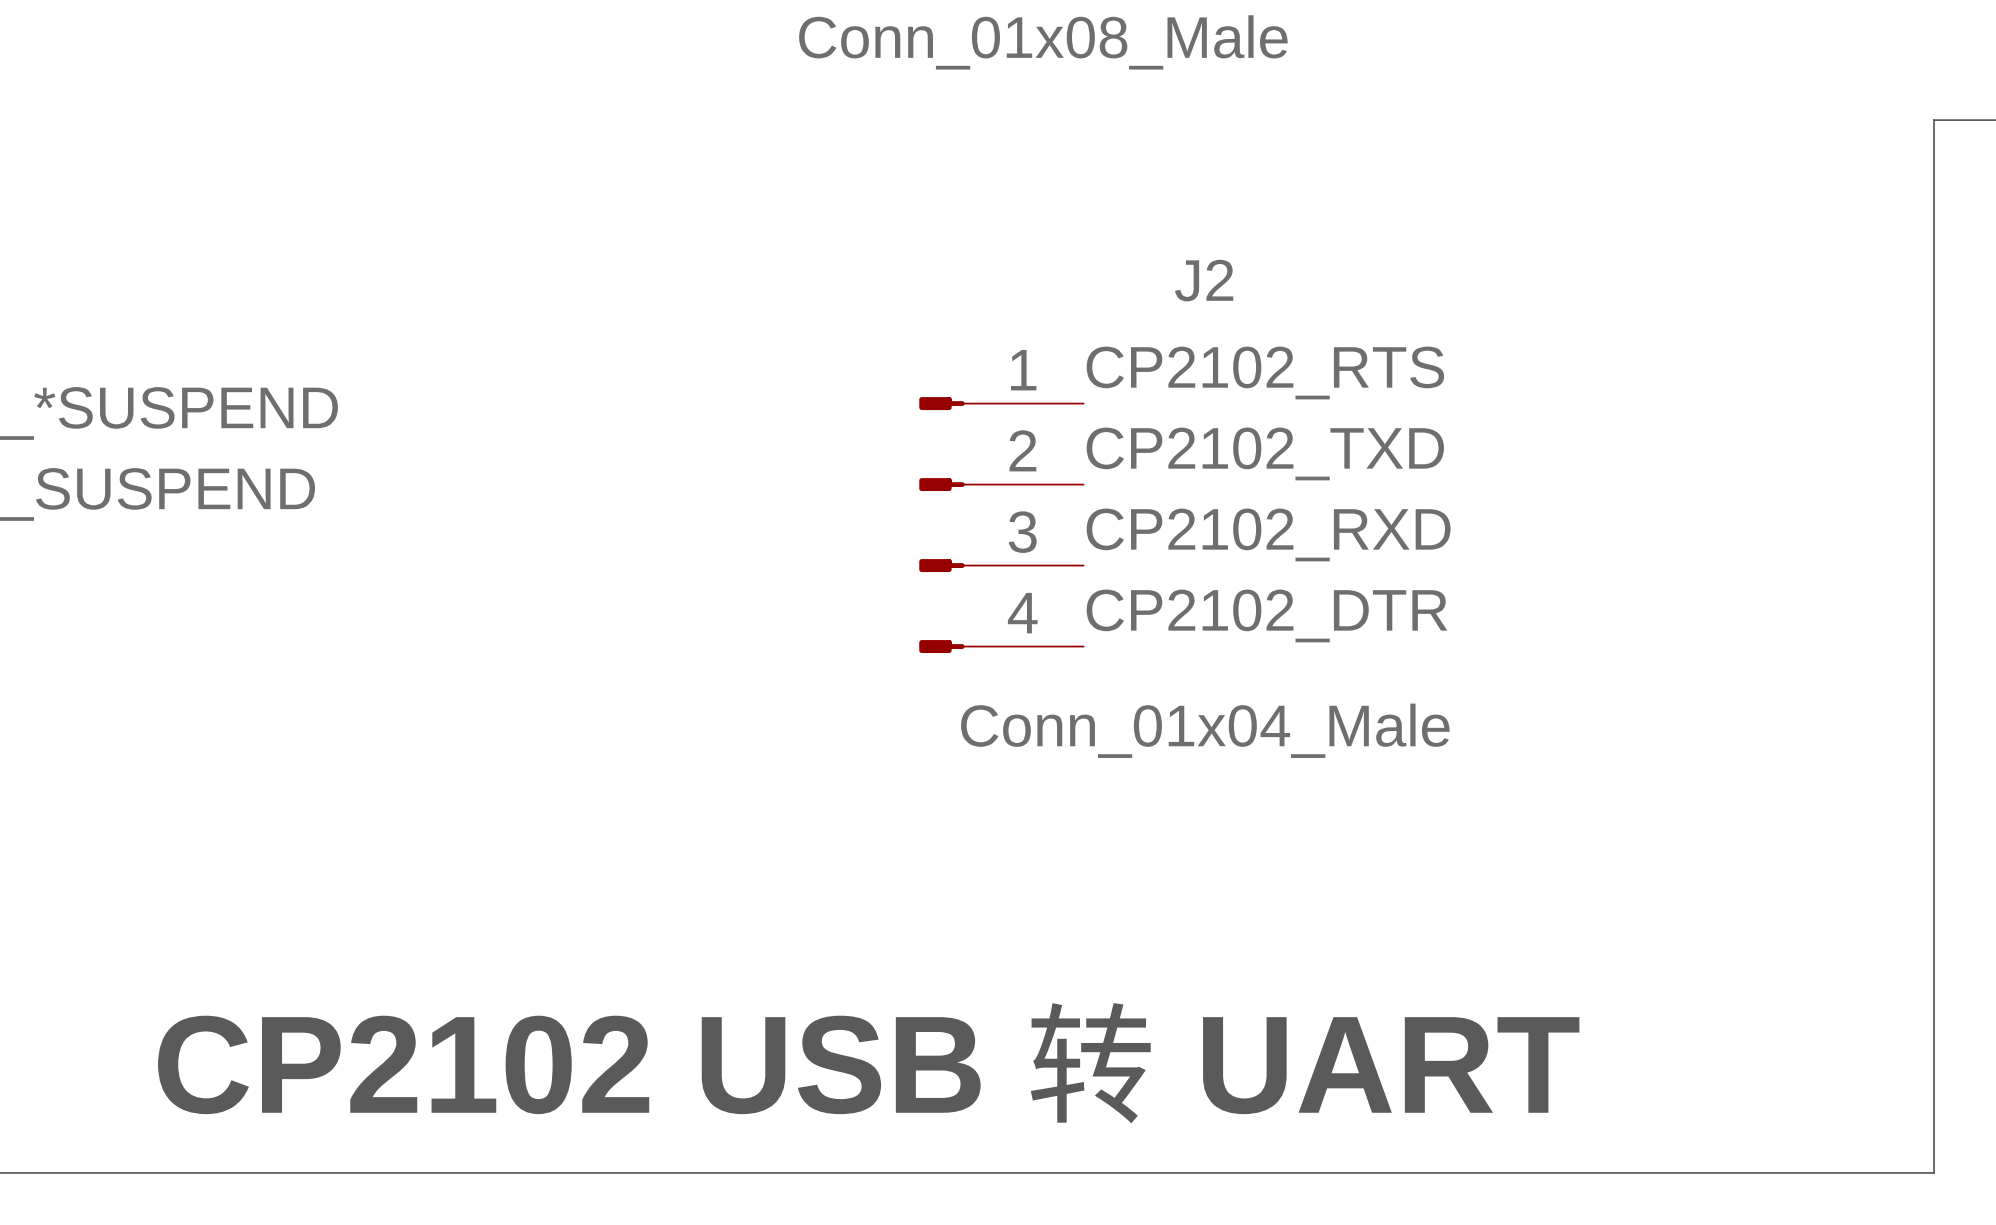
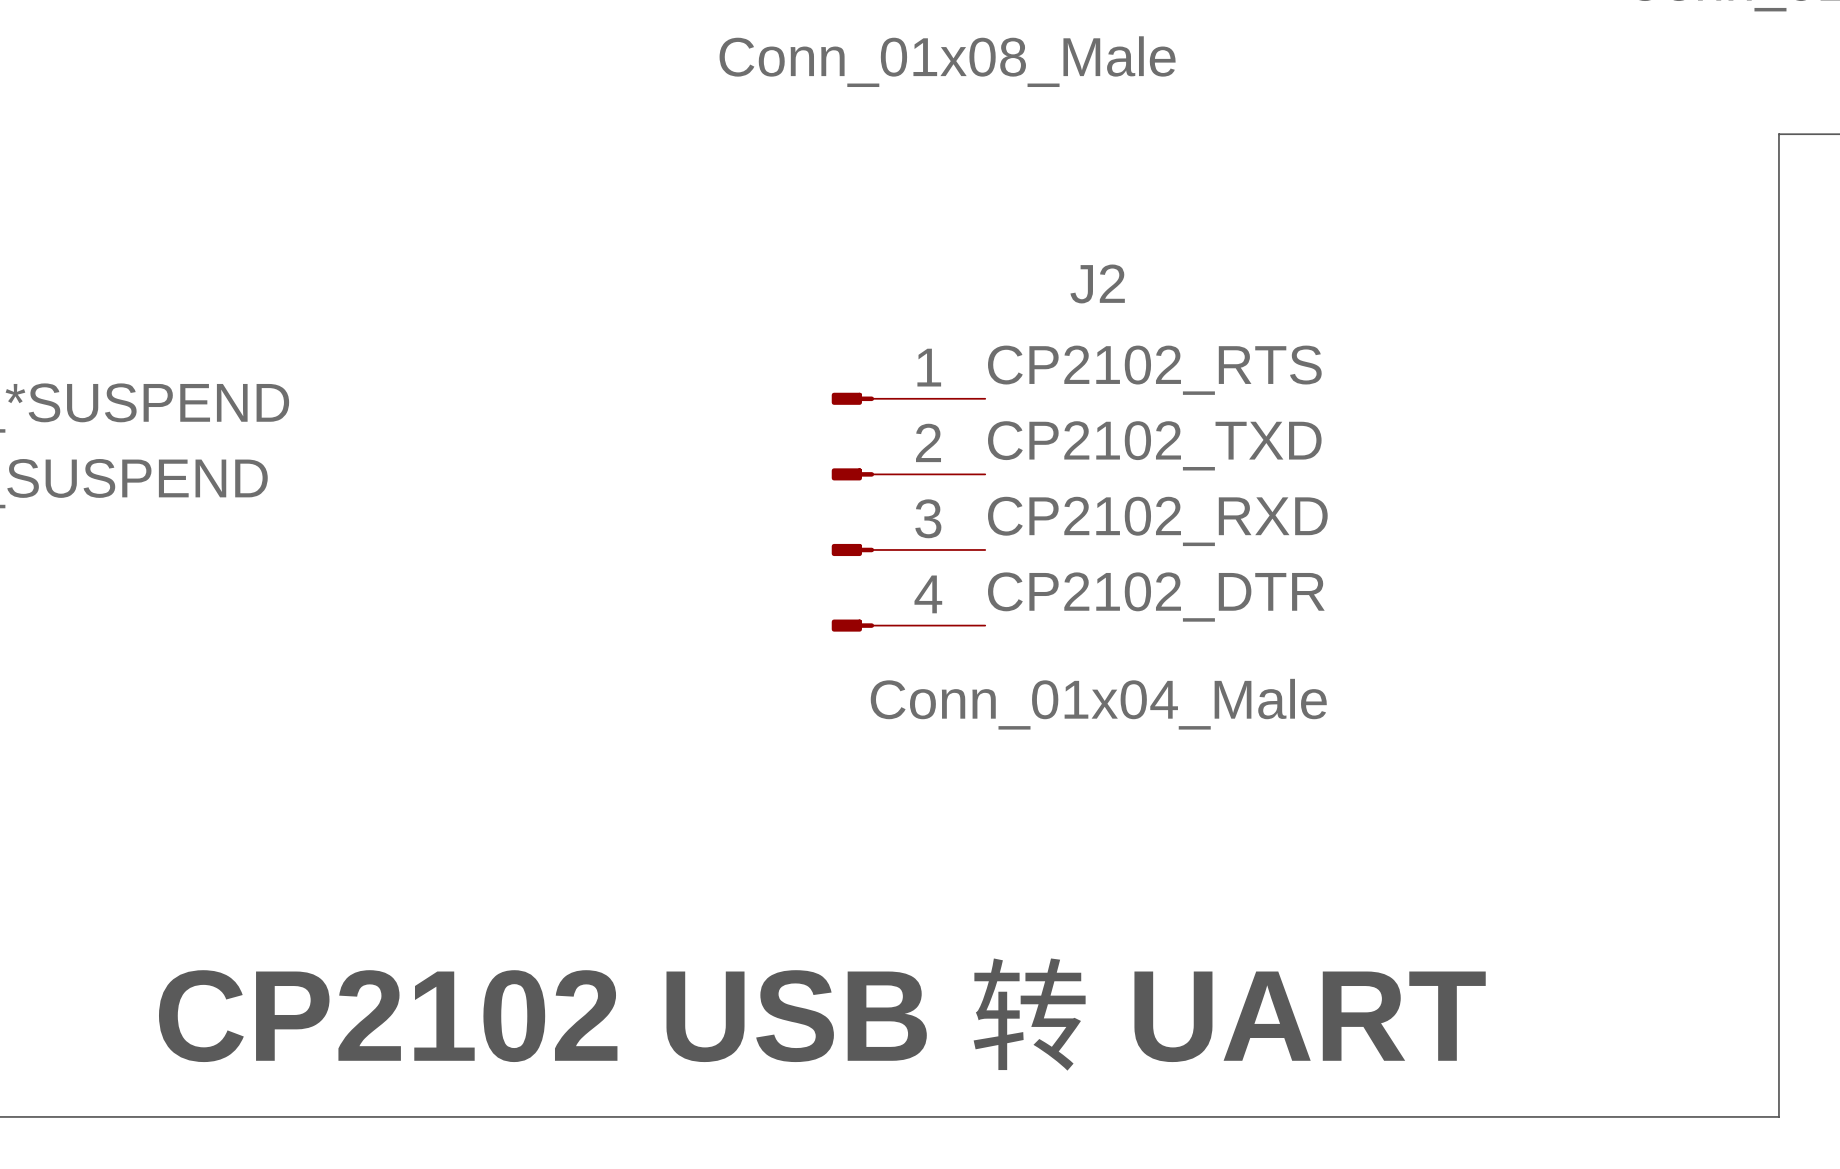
text position: CP2102 USB 转 UART (868, 1063) -> CP2102 USB 转 UART (822, 1014)

